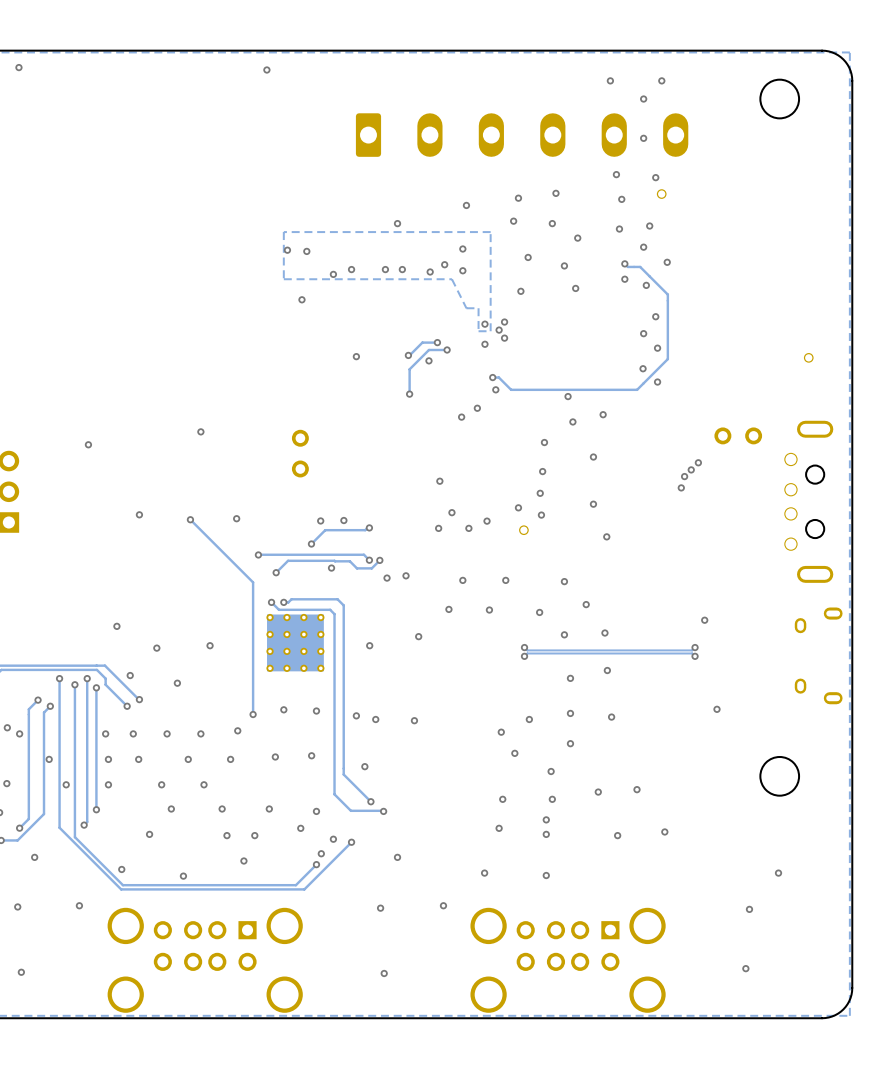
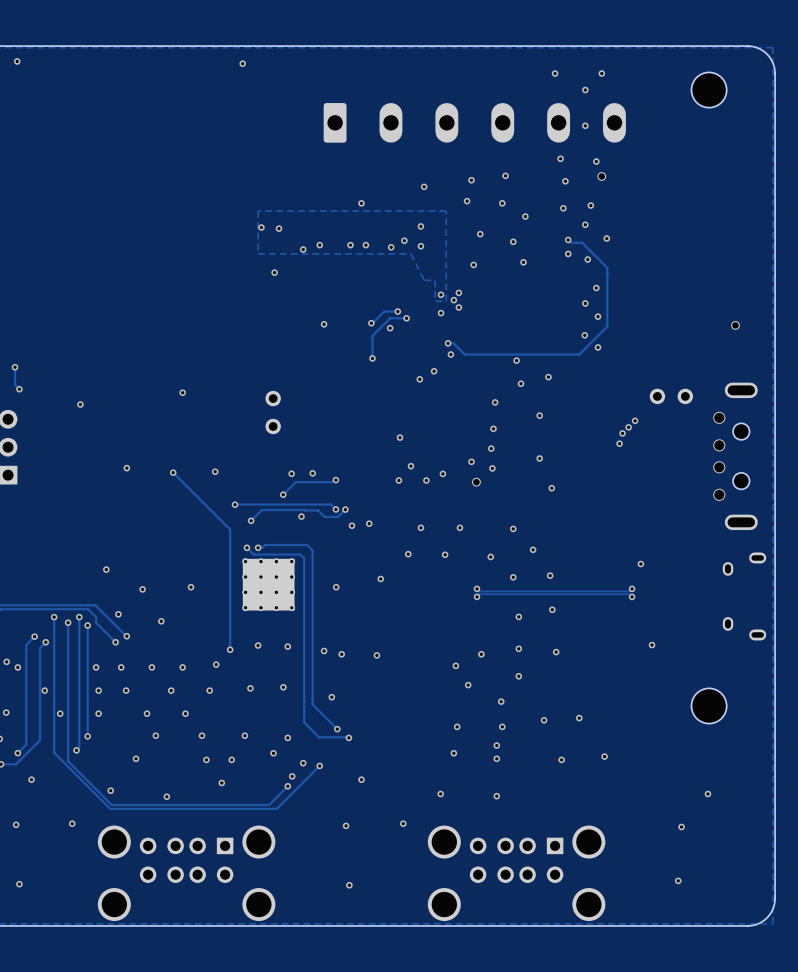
track: none -> (15, 367) (15, 384) (19, 389)
via: none -> (15, 367)
via: none -> (19, 389)

